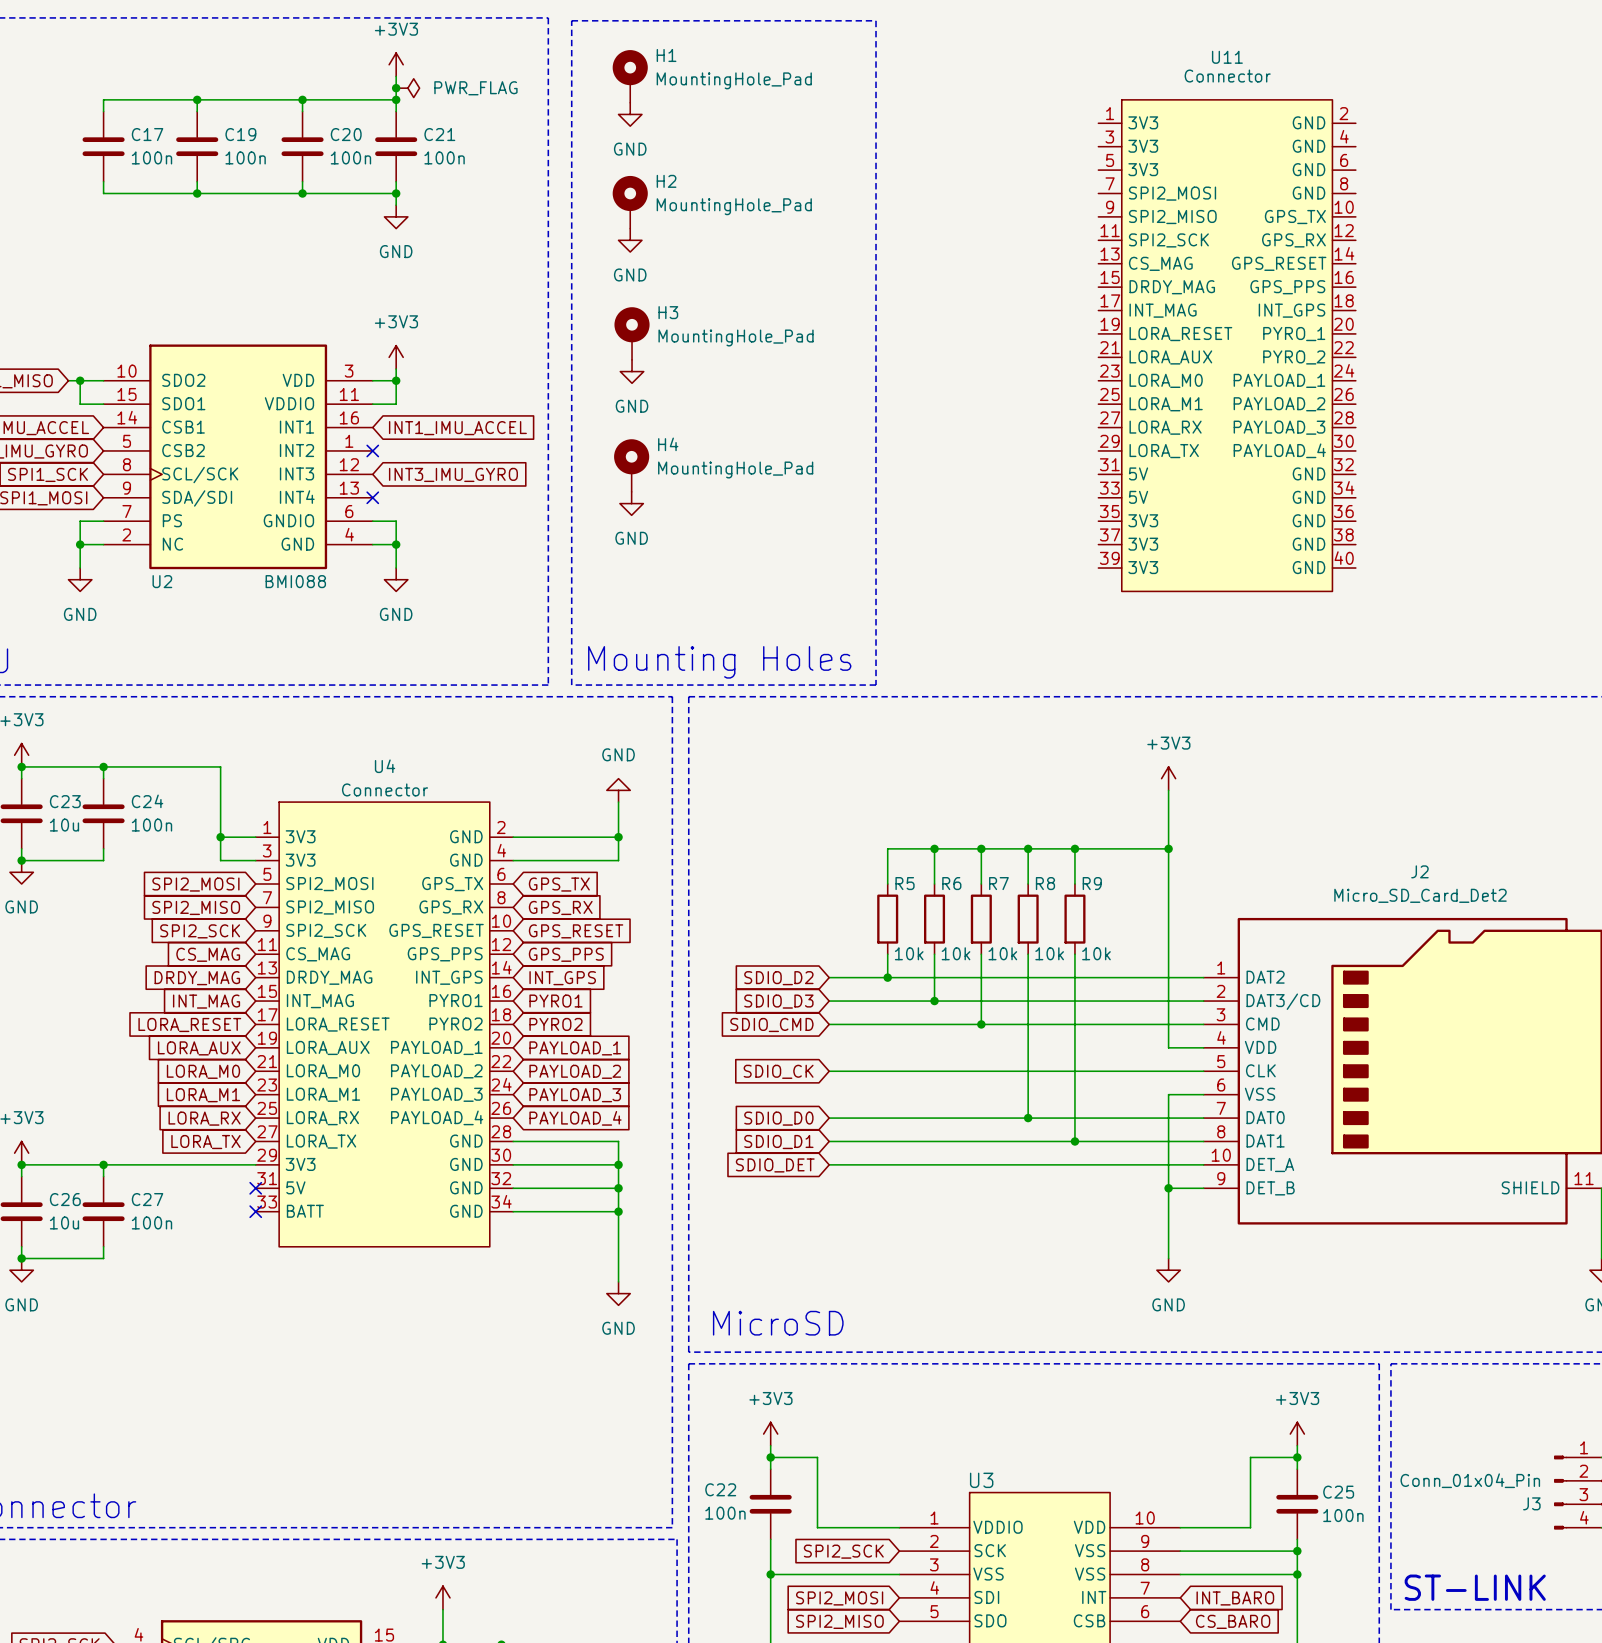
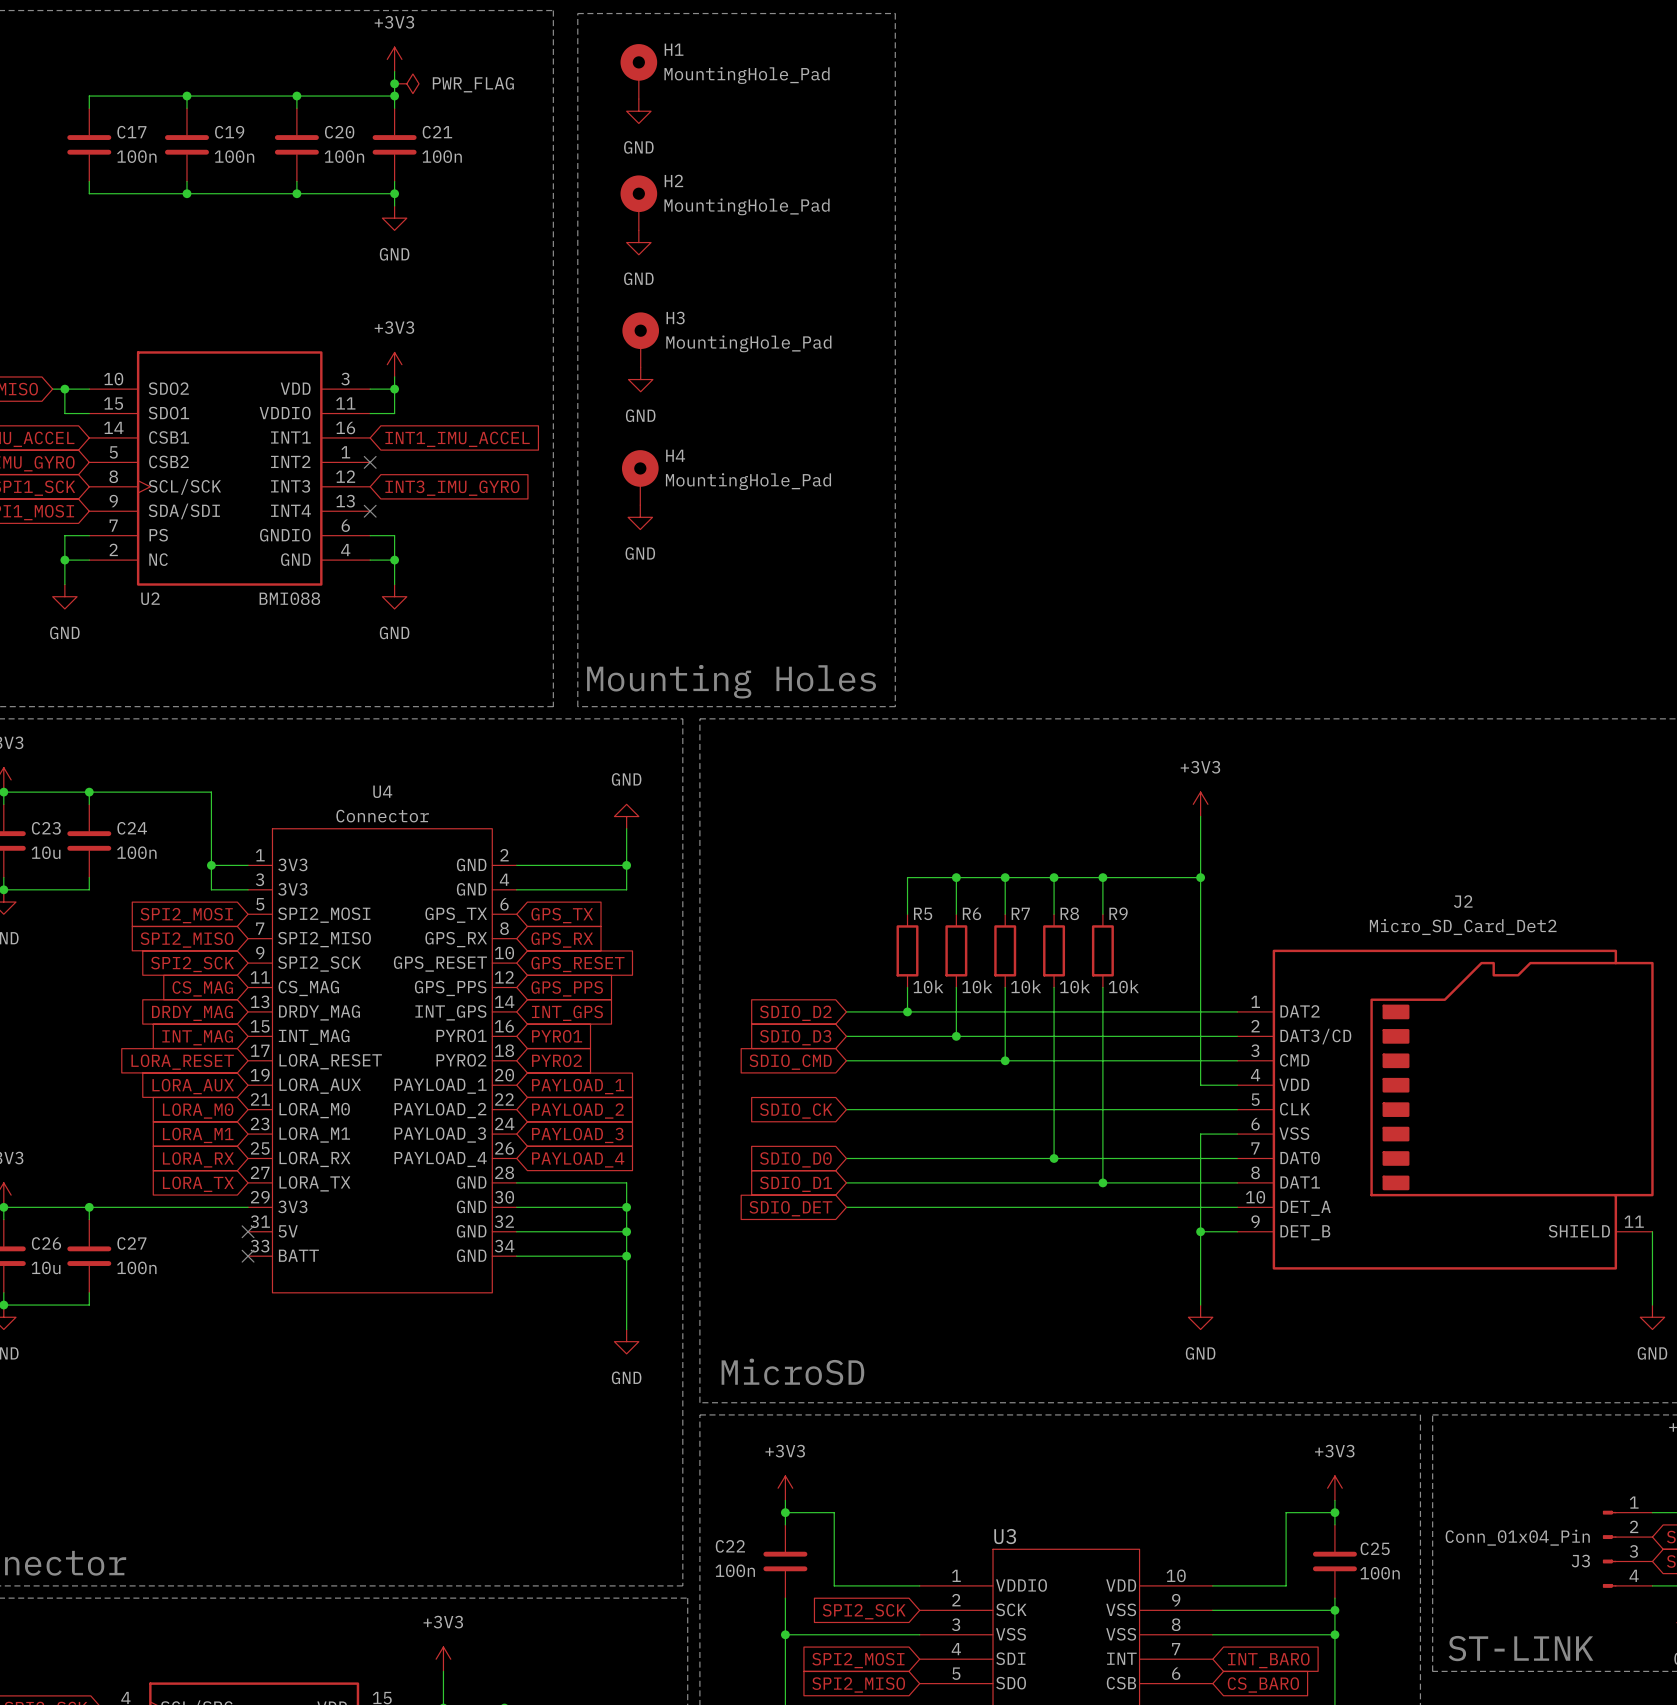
U11: Connector (1227, 345) -> none

